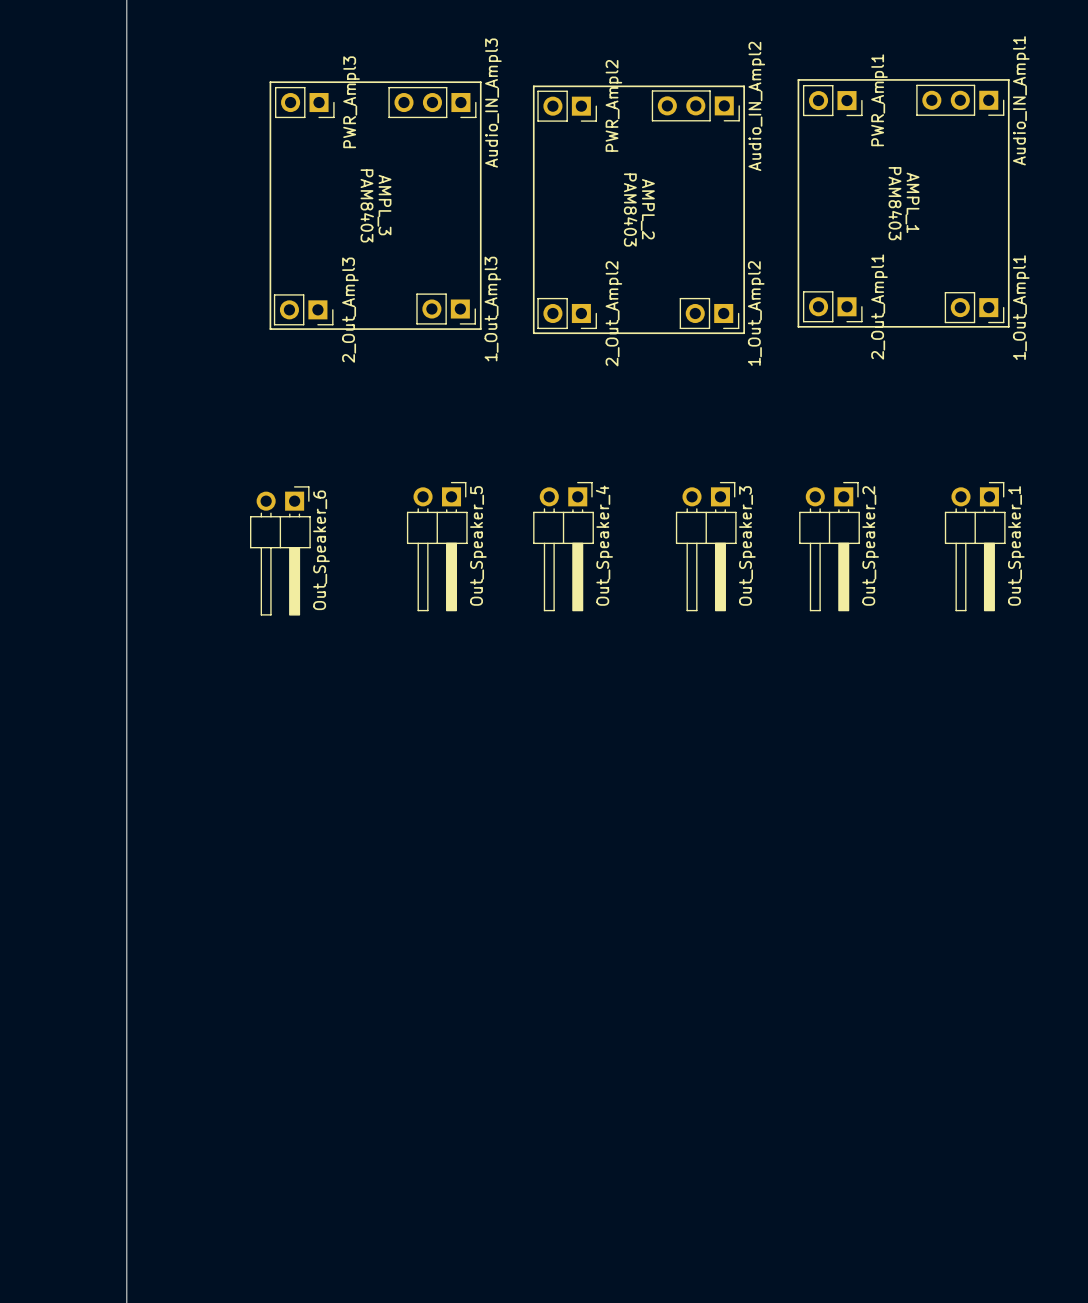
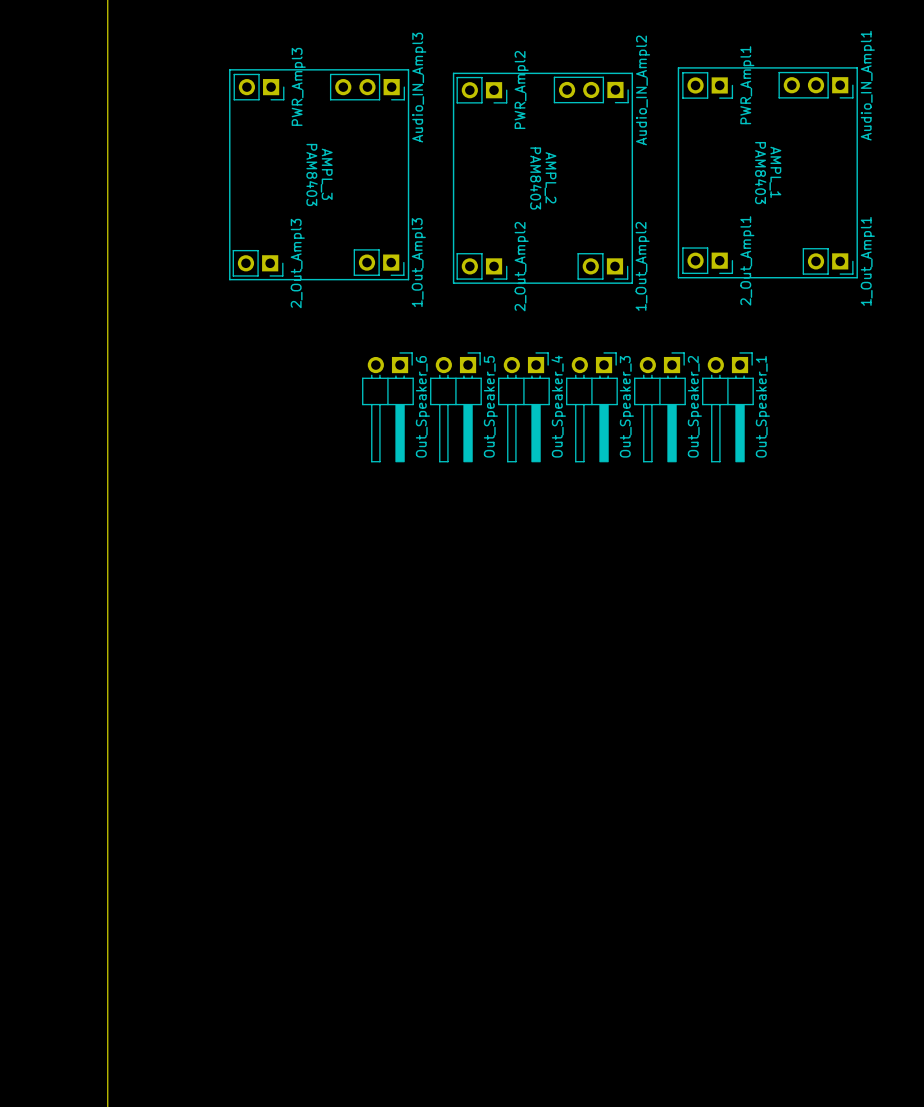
Out_Speaker_5 position: (437, 546) -> (455, 407)
Out_Speaker_4 position: (563, 546) -> (523, 407)
Out_Speaker_3 position: (706, 546) -> (591, 407)
Out_Speaker_2 position: (829, 546) -> (659, 407)
Out_Speaker_1 position: (975, 546) -> (727, 407)
Out_Speaker_6 position: (280, 550) -> (387, 407)

